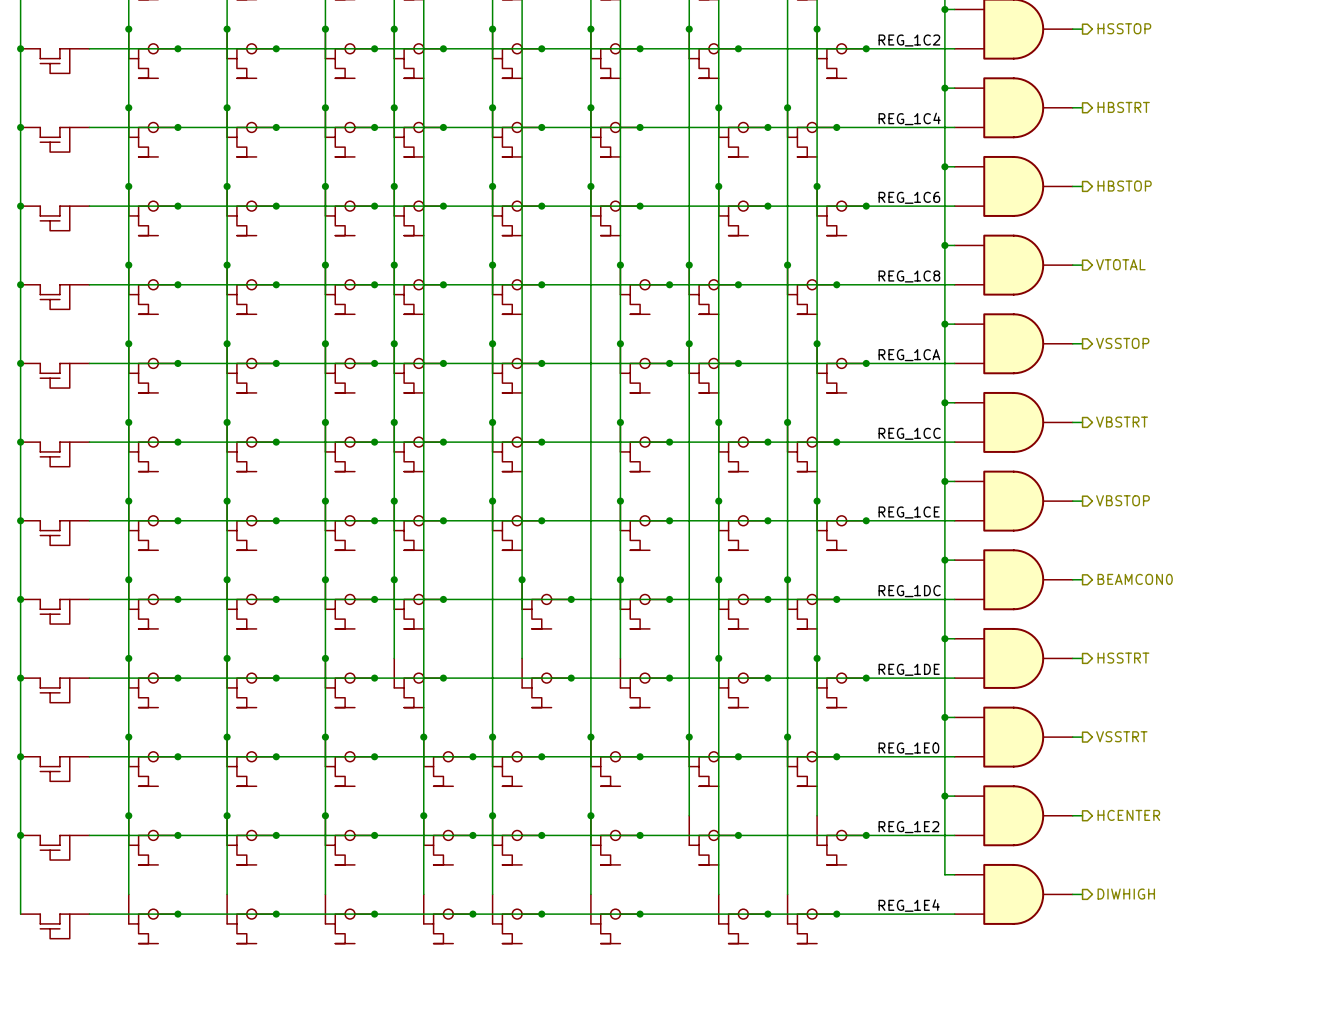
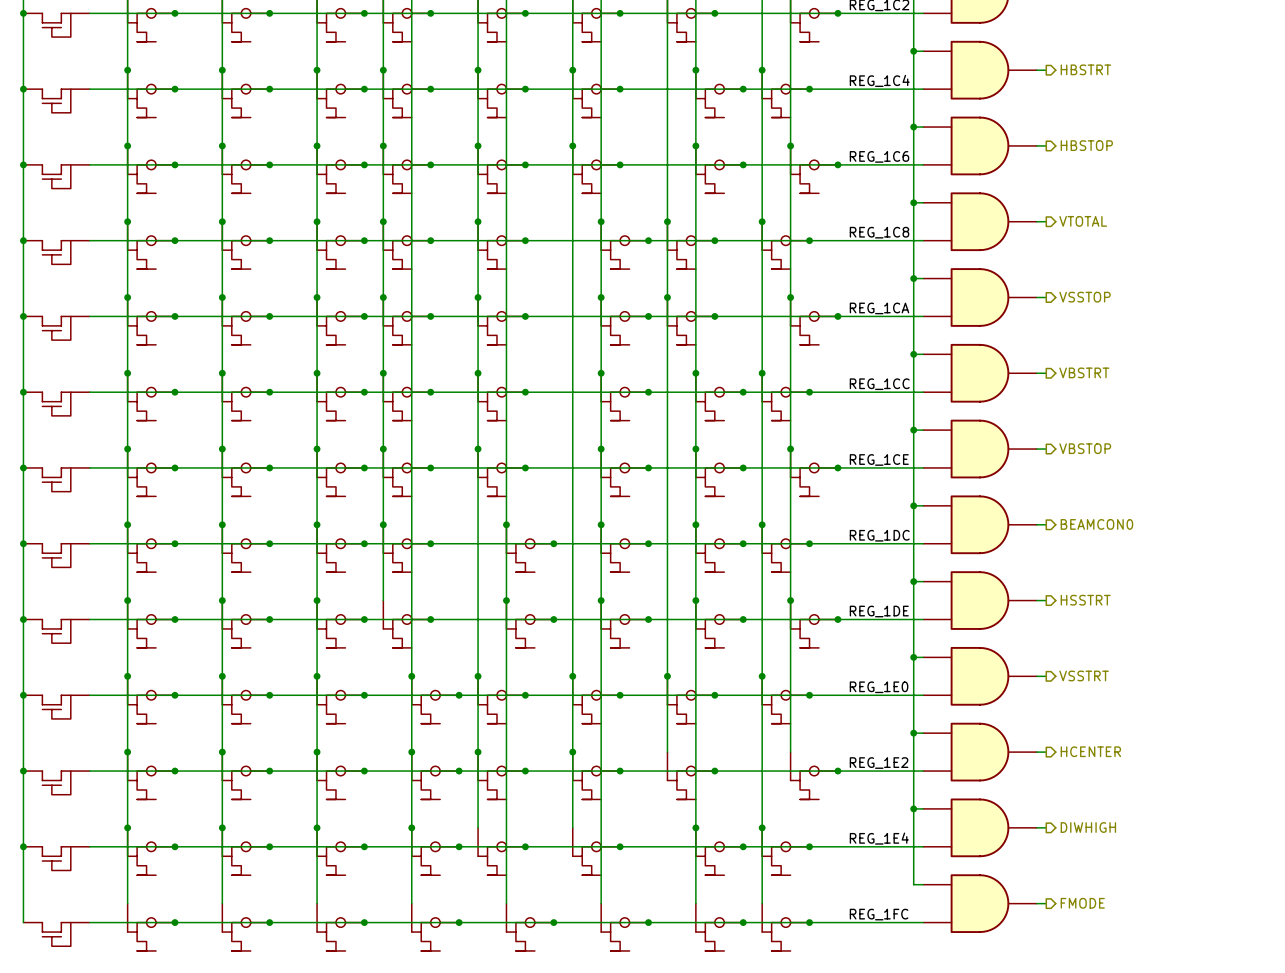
wire: none -> (506, 600) (506, 903)
junction: none -> (506, 600)
wire: none -> (601, 600) (601, 903)
junction: none -> (601, 600)
wire: none -> (913, 808) (913, 884) (923, 884)
junction: none -> (913, 808)
wire: none -> (127, 827) (127, 903)
junction: none -> (127, 827)
wire: none -> (222, 827) (222, 903)
junction: none -> (222, 827)
wire: none -> (317, 827) (317, 903)
junction: none -> (317, 827)
wire: none -> (411, 827) (411, 903)
junction: none -> (411, 827)
wire: none -> (695, 827) (695, 903)
junction: none -> (695, 827)
wire: none -> (762, 827) (762, 903)
junction: none -> (762, 827)
wire: none -> (23, 846) (23, 922)
junction: none -> (23, 846)
hierarchical label: none -> FMODE (1082, 903)
part: none -> (980, 903)
wire: none -> (1036, 903) (1046, 903)
label: none -> REG_1FC (879, 914)
wire: none -> (89, 922) (923, 922)
junction: none -> (174, 922)
junction: none -> (269, 922)
junction: none -> (364, 922)
junction: none -> (459, 922)
junction: none -> (553, 922)
junction: none -> (648, 922)
junction: none -> (743, 922)
junction: none -> (809, 922)
part: none -> (151, 927)
part: none -> (246, 927)
part: none -> (340, 927)
part: none -> (435, 927)
part: none -> (530, 927)
part: none -> (624, 927)
part: none -> (719, 927)
part: none -> (785, 927)
part: none -> (56, 934)

